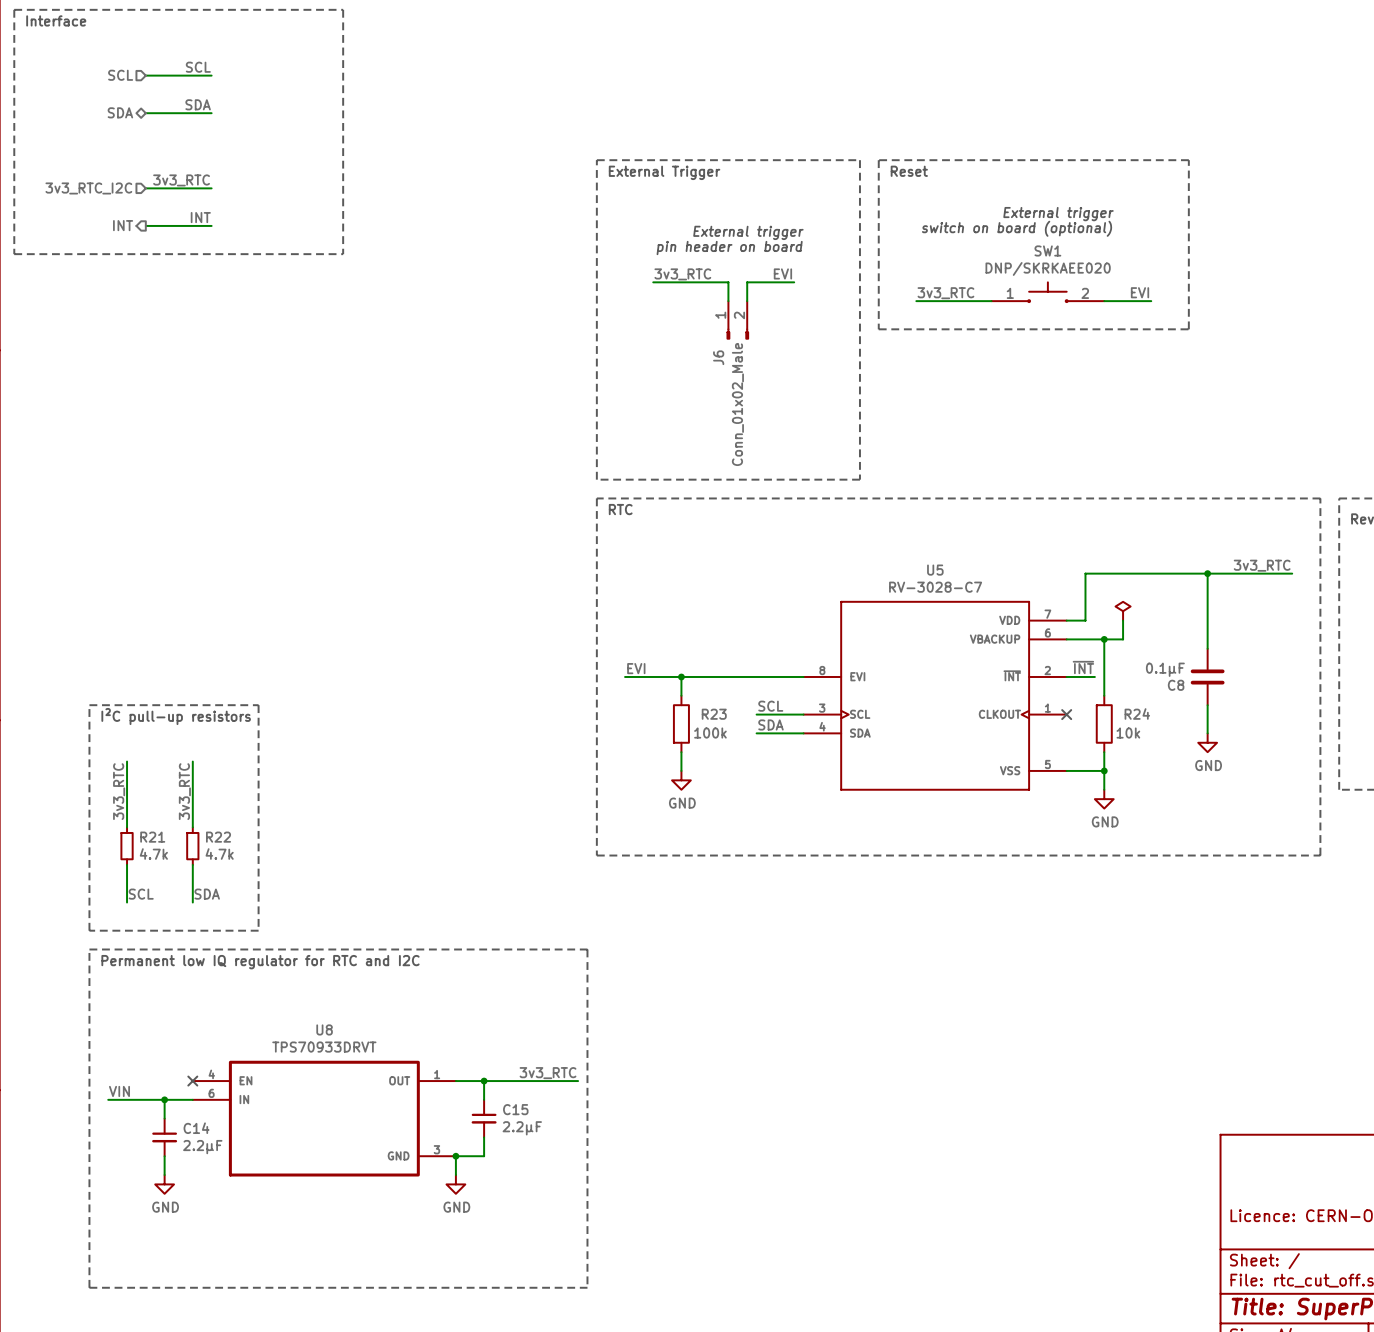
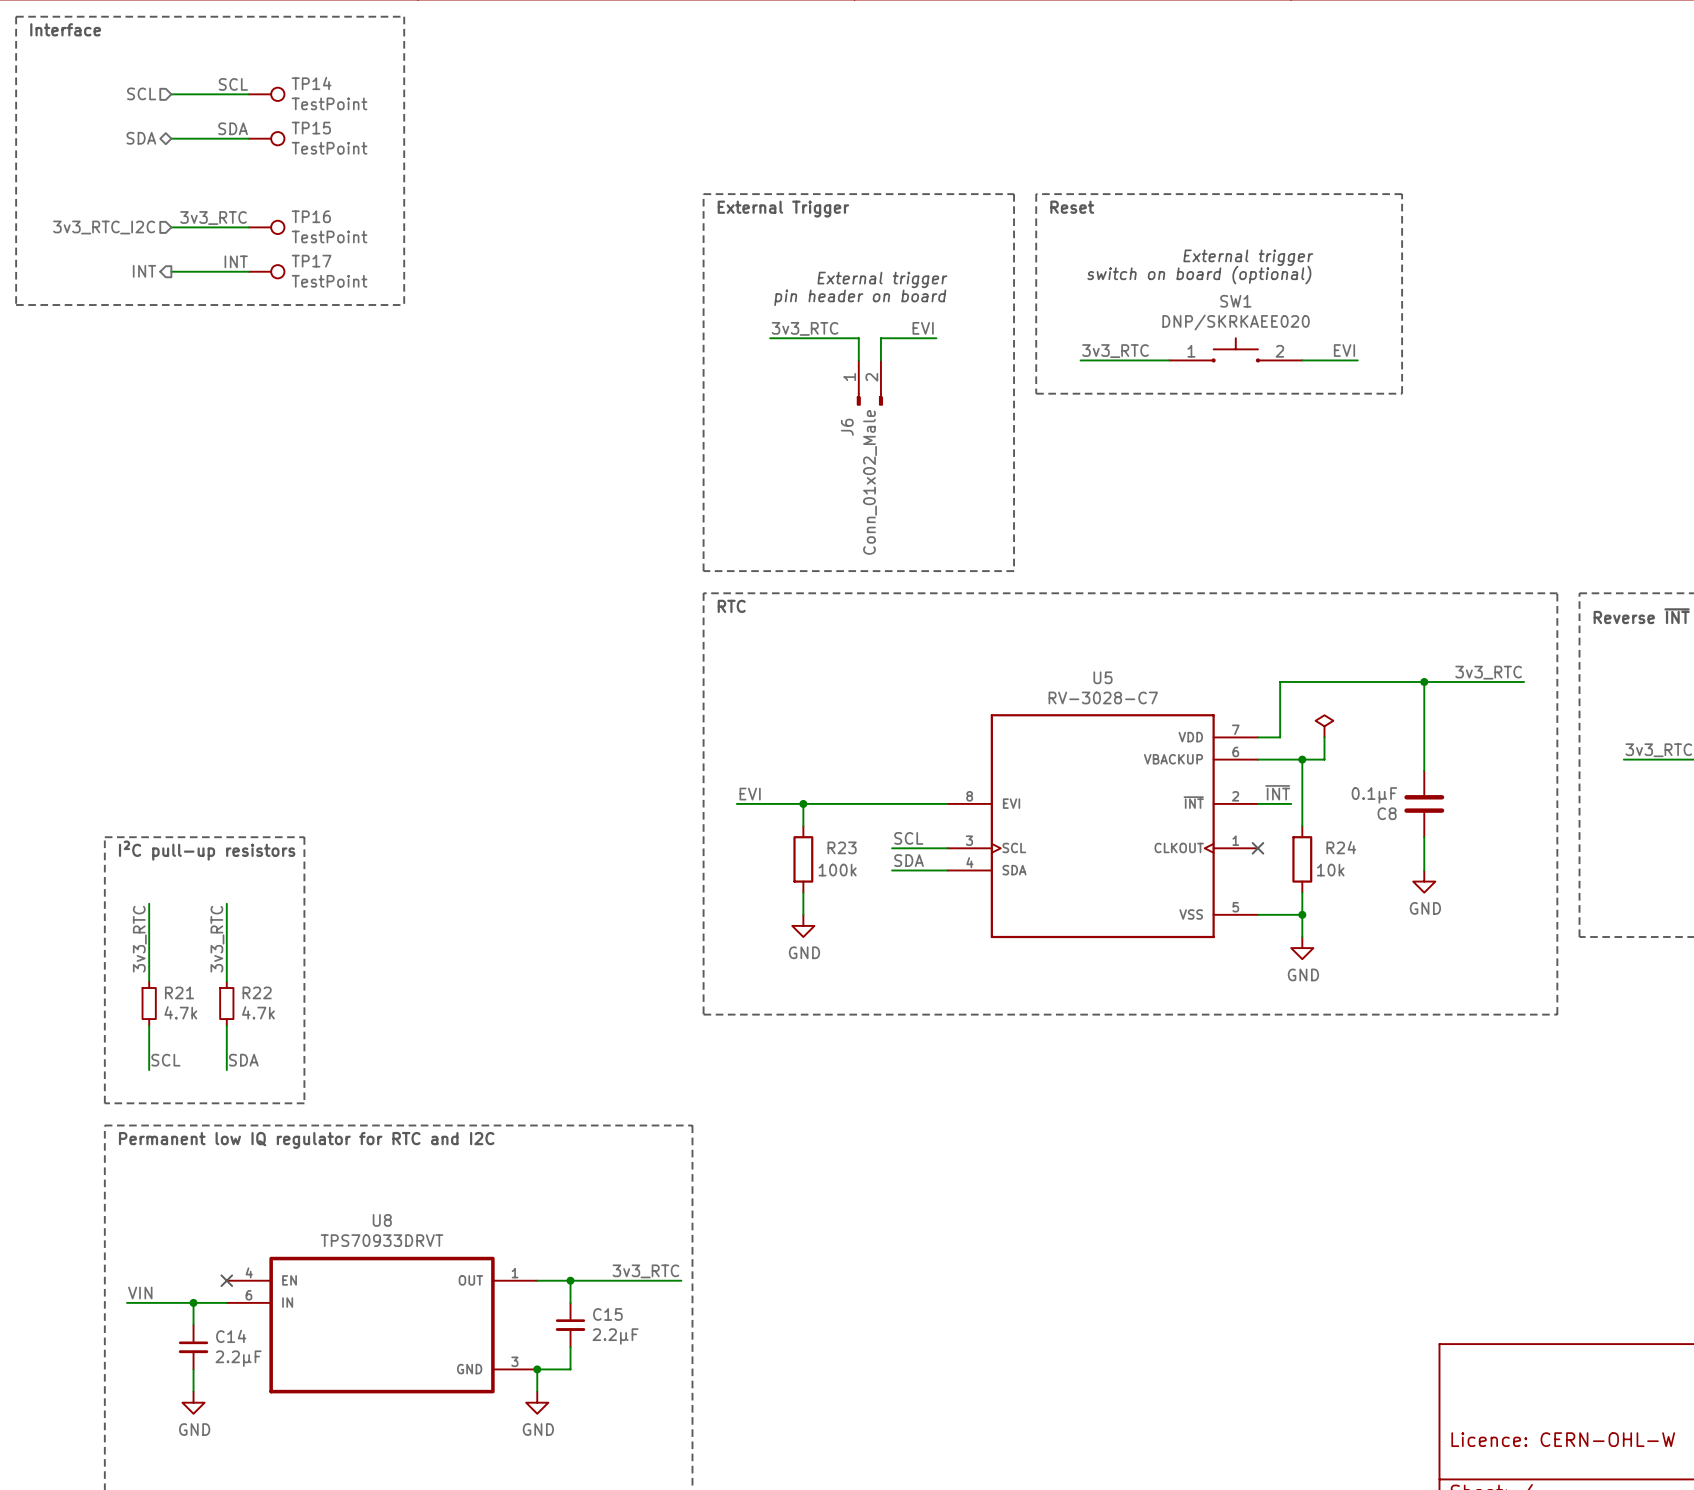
TP14: none -> TestPoint (266, 94)
TP15: none -> TestPoint (266, 138)
TP16: none -> TestPoint (266, 227)
TP17: none -> TestPoint (266, 271)

